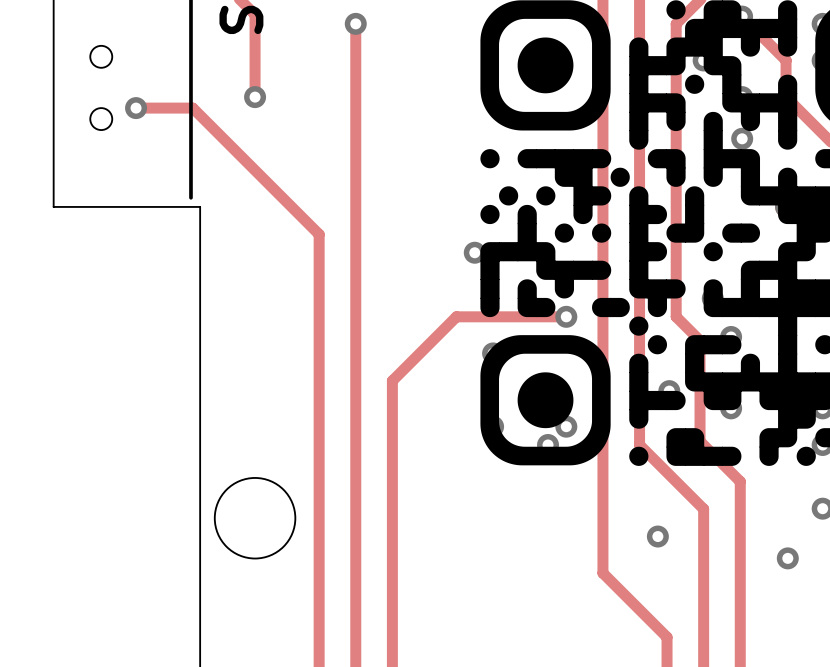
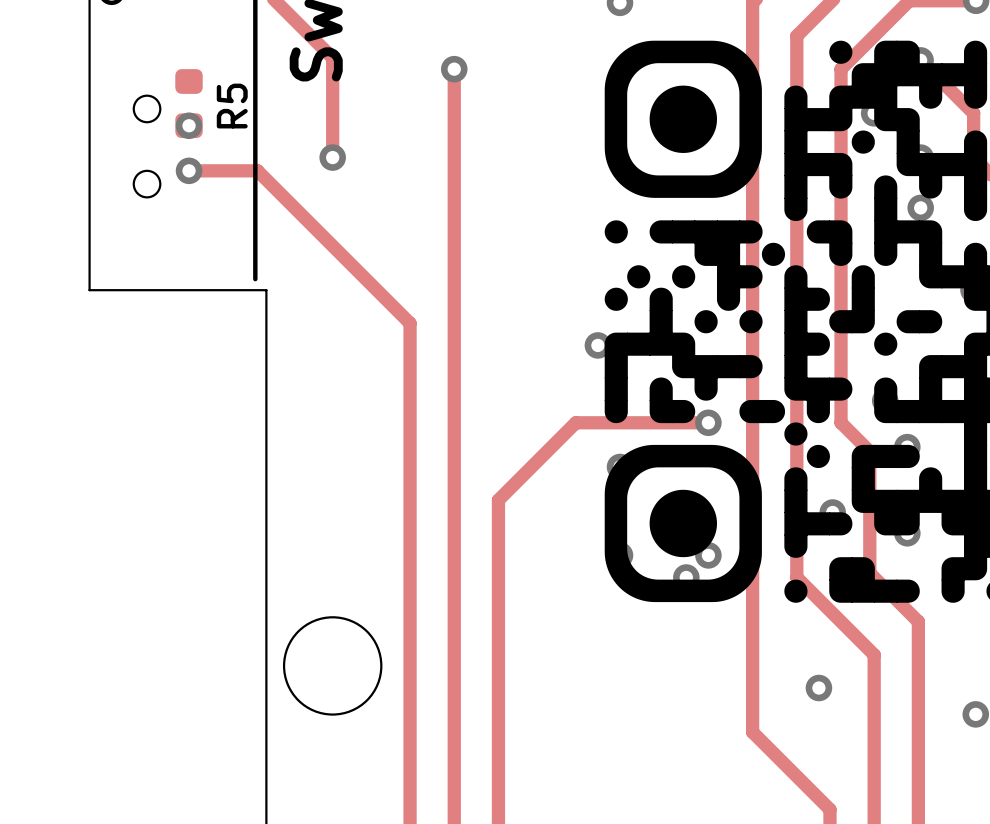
R5: none -> (189, 103)
via: none -> (189, 125)

